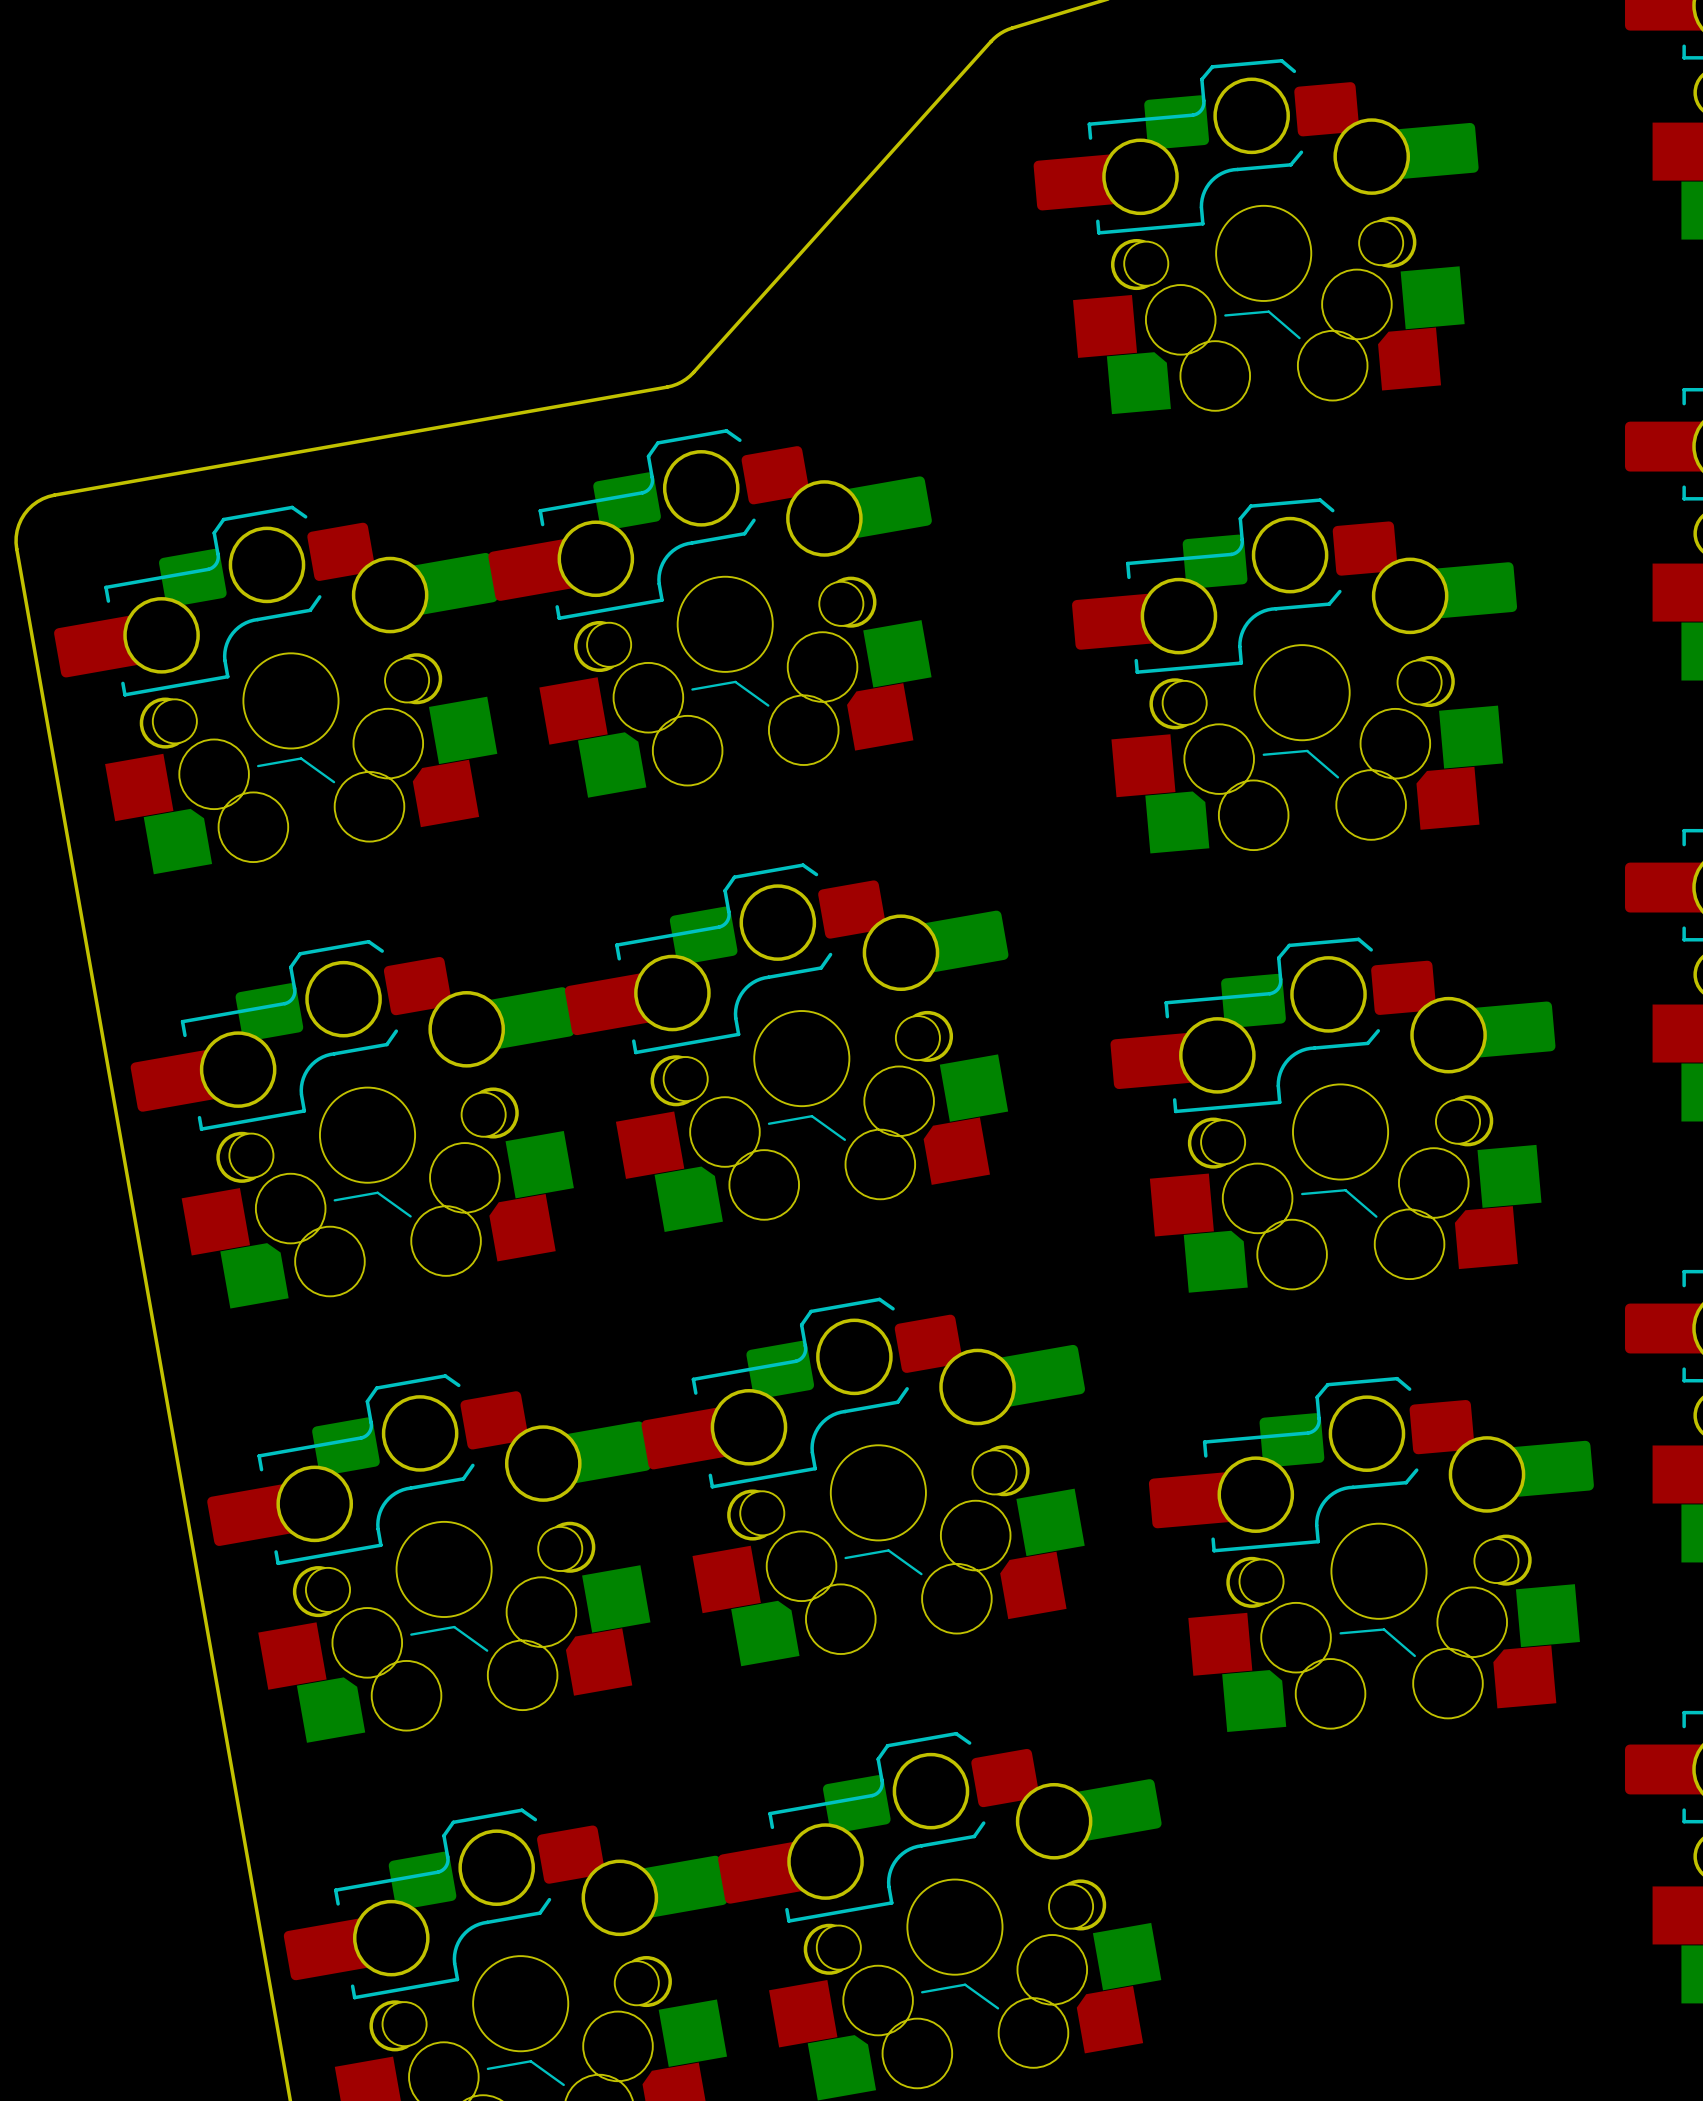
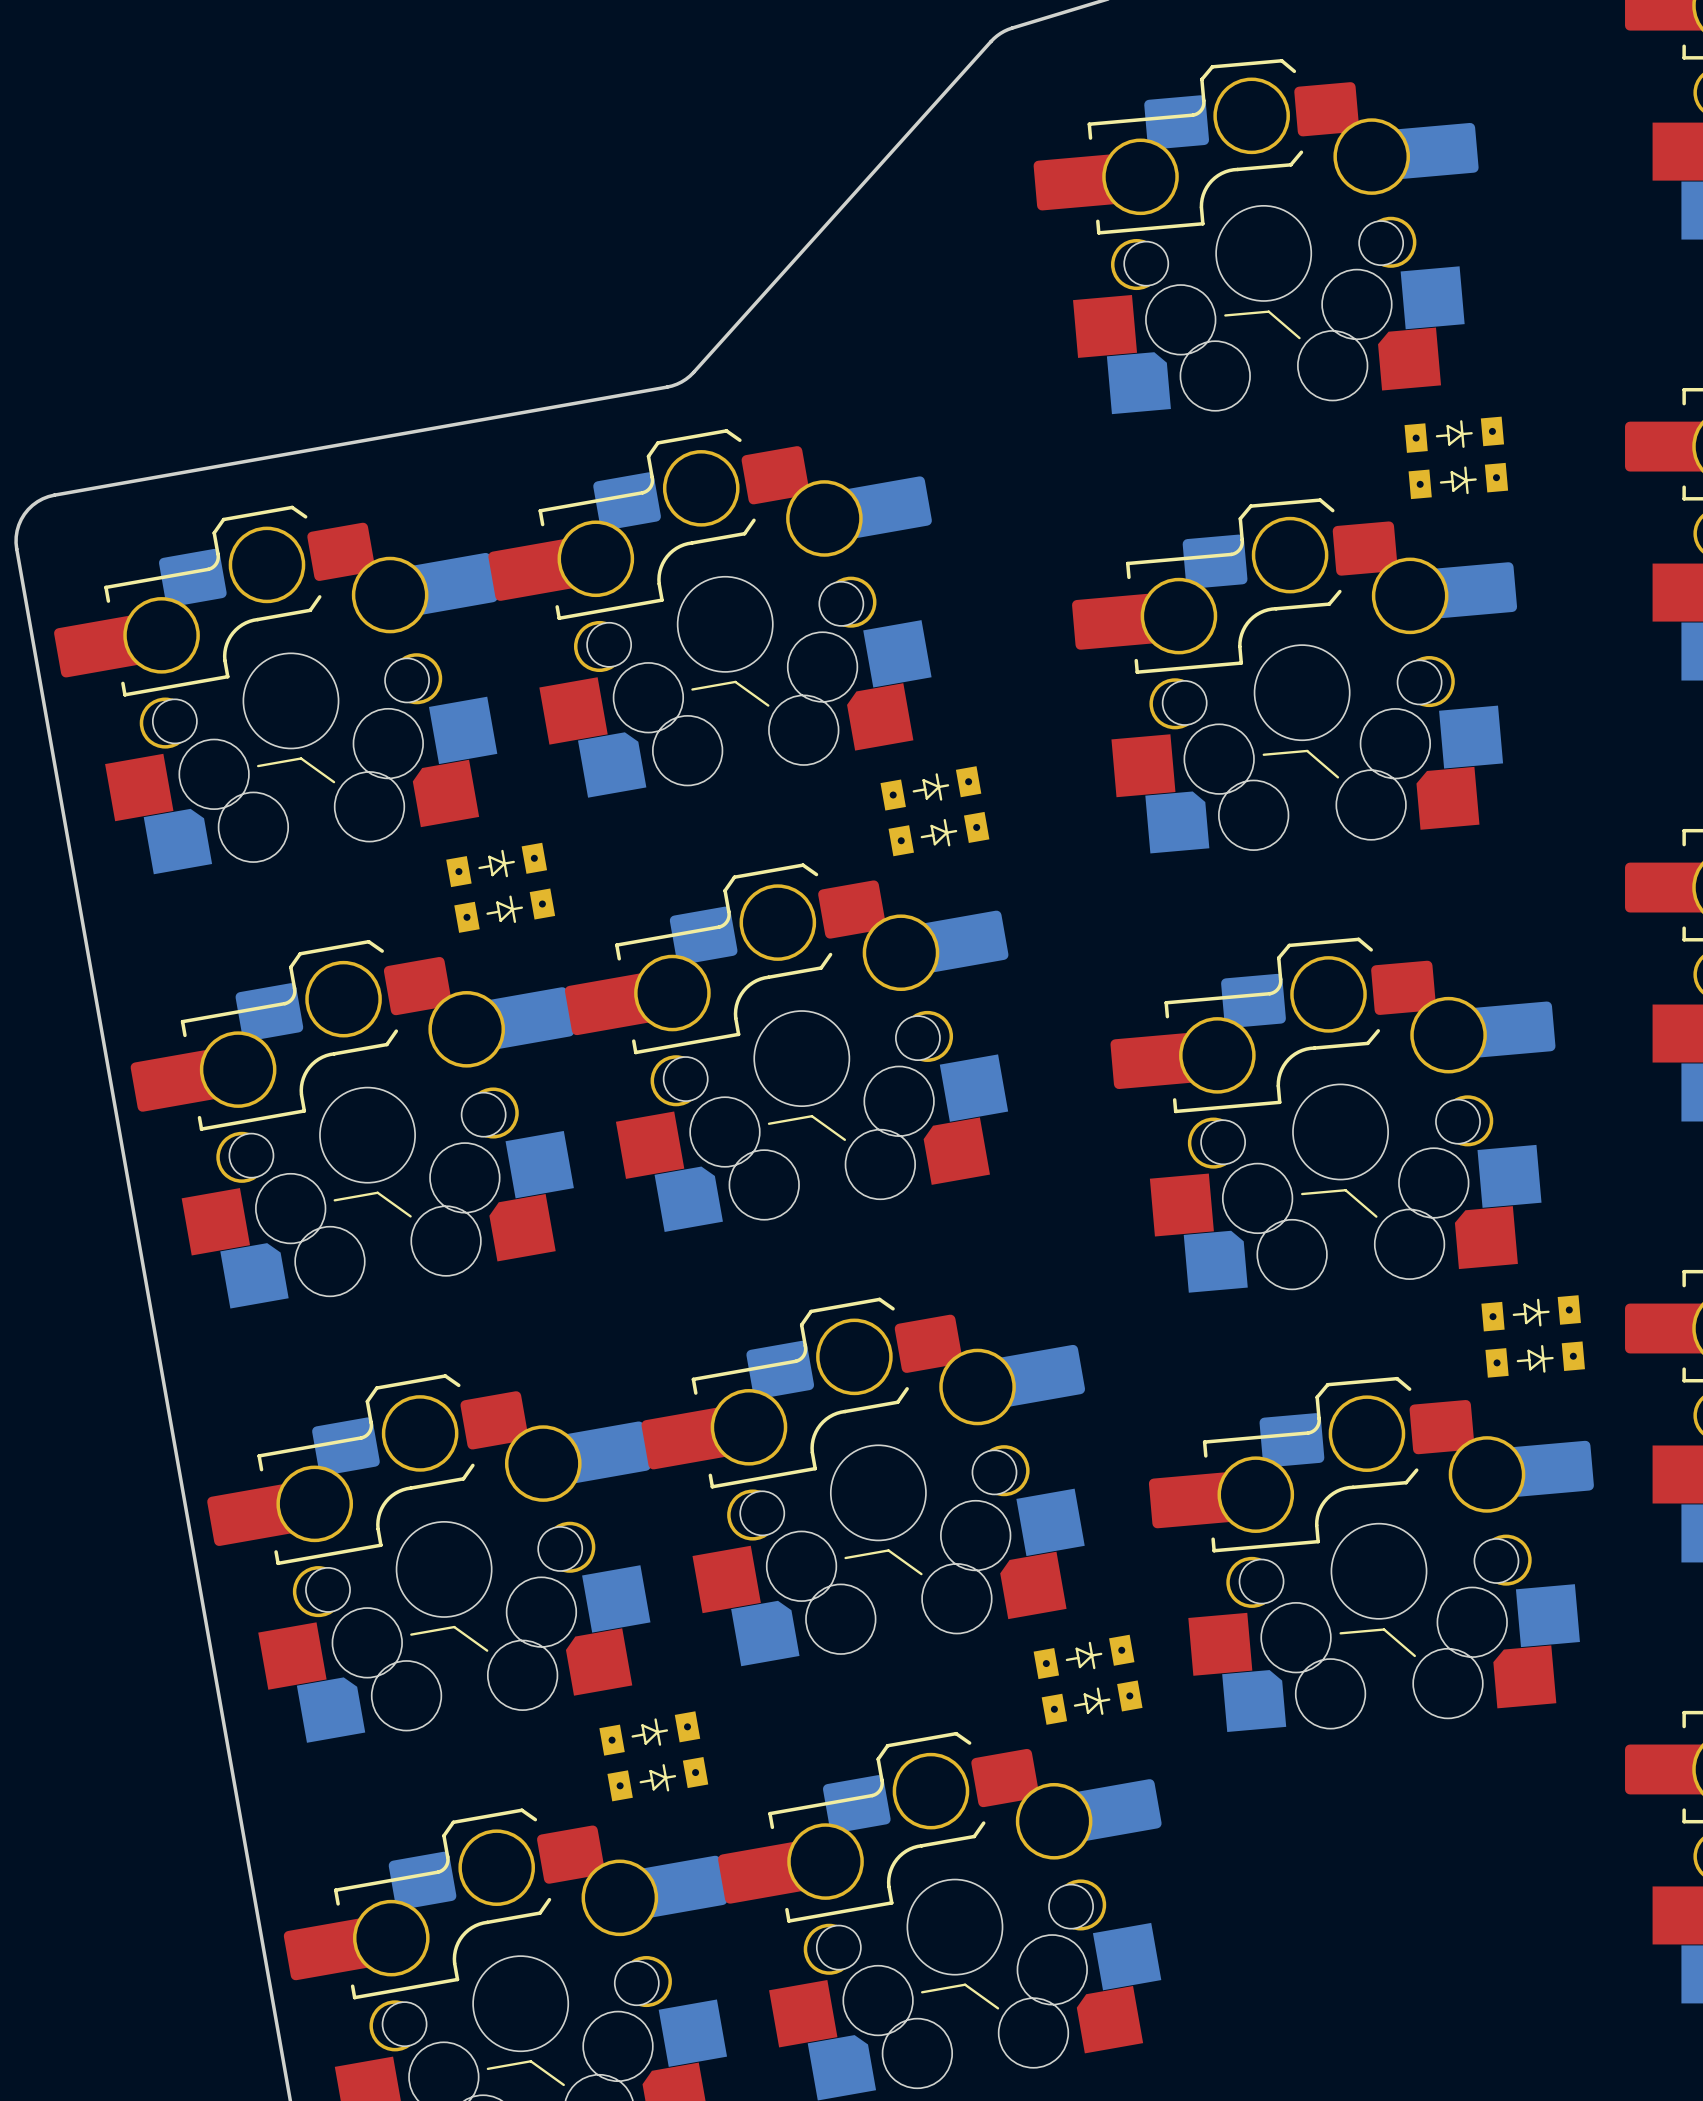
part: none -> (1454, 434)
part: none -> (1458, 480)
part: none -> (930, 788)
part: none -> (938, 834)
part: none -> (496, 864)
part: none -> (504, 910)
part: none -> (1531, 1313)
part: none -> (1535, 1359)
part: none -> (1084, 1656)
part: none -> (1092, 1702)
part: none -> (649, 1733)
part: none -> (657, 1779)

